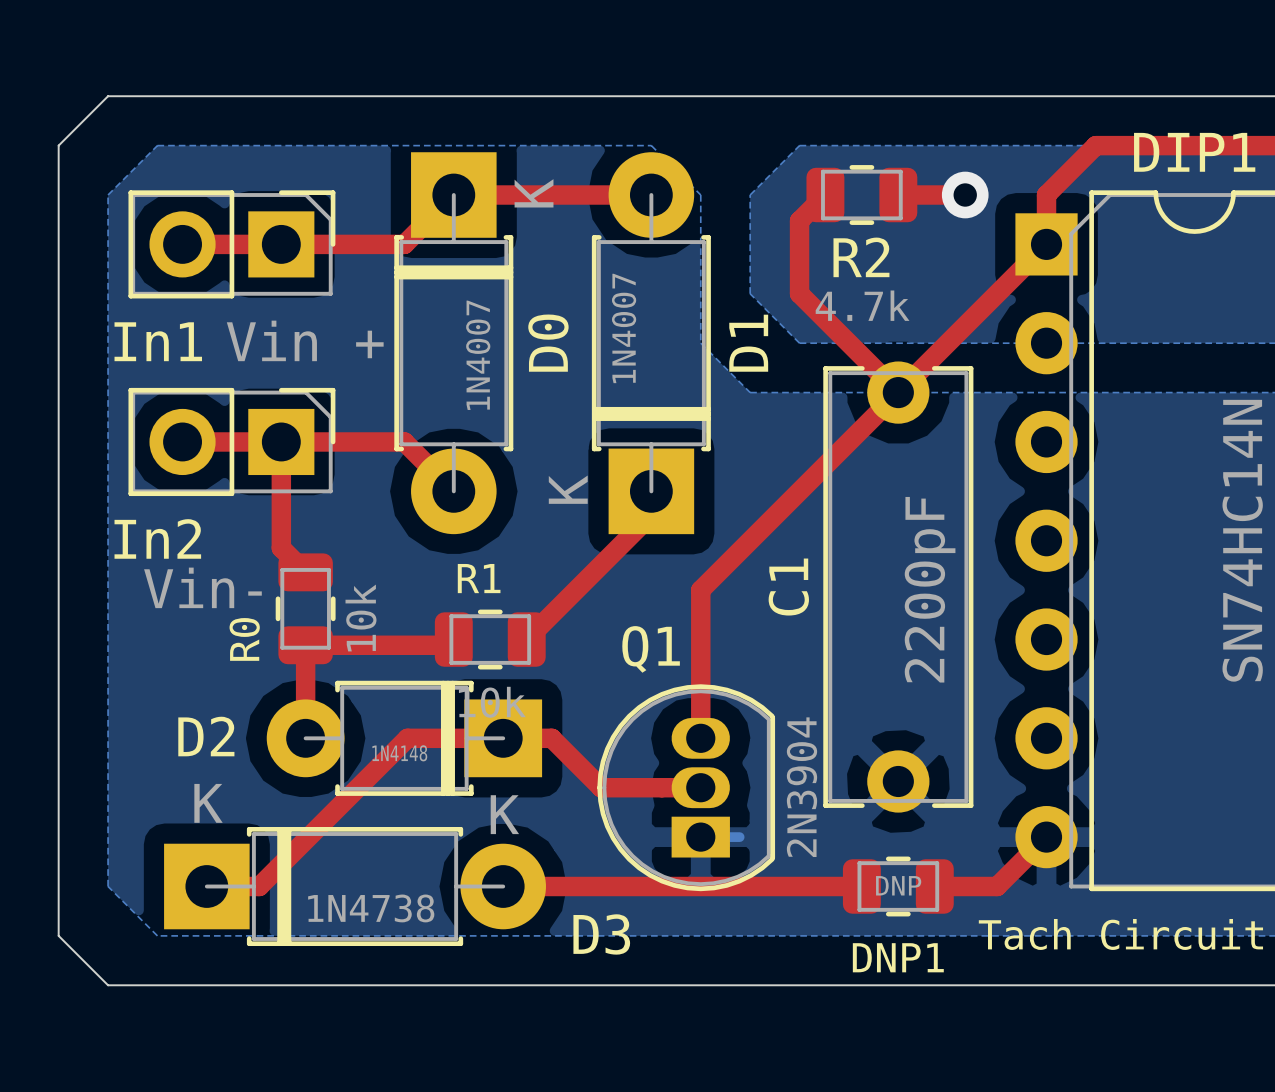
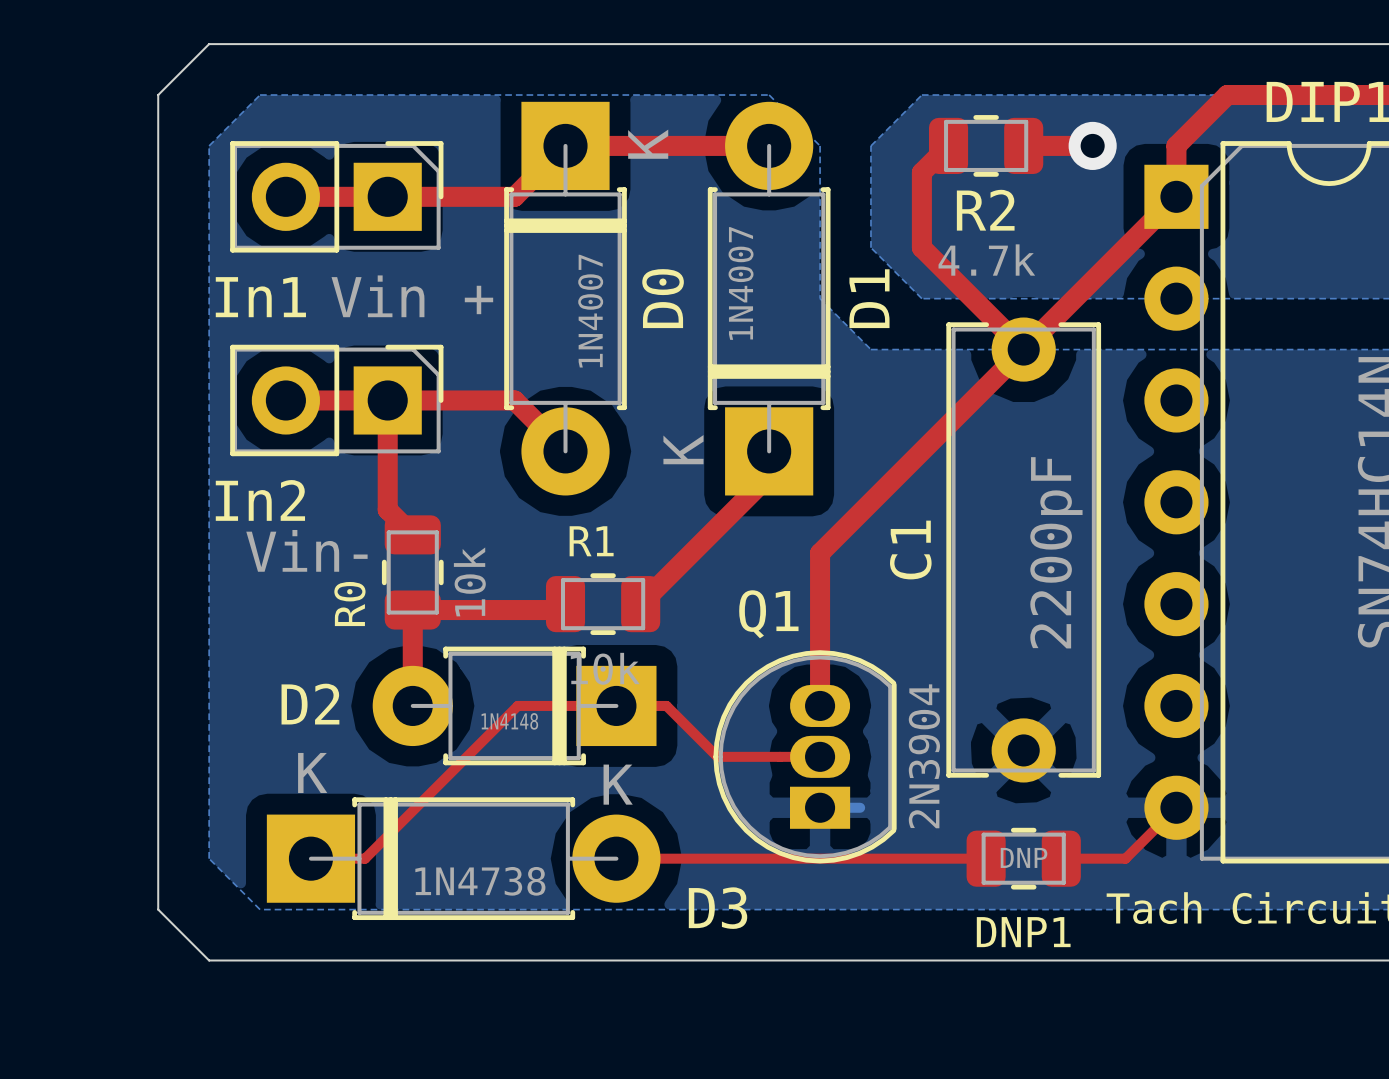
top track width: thick (700, 787) (601, 787) (551, 738) (407, 738) (259, 886) (206, 886) -> thin (820, 756) (717, 756) (666, 705) (517, 705) (365, 858) (310, 858)
top track width: thick (1046, 837) (997, 886) (934, 886) -> thin (1176, 807) (1125, 858) (1061, 858)
top track width: thick (503, 886) (861, 886) -> thin (616, 858) (986, 858)

